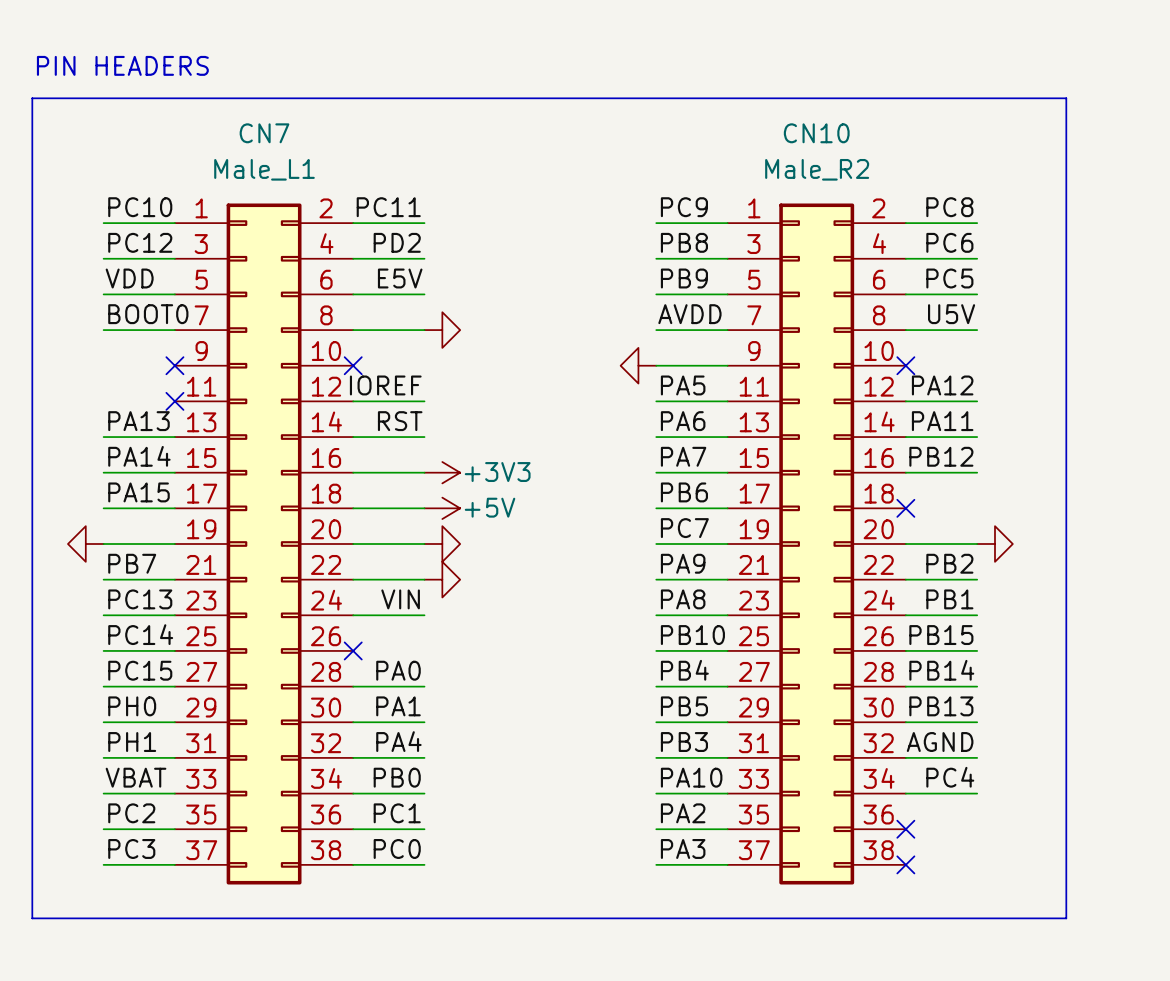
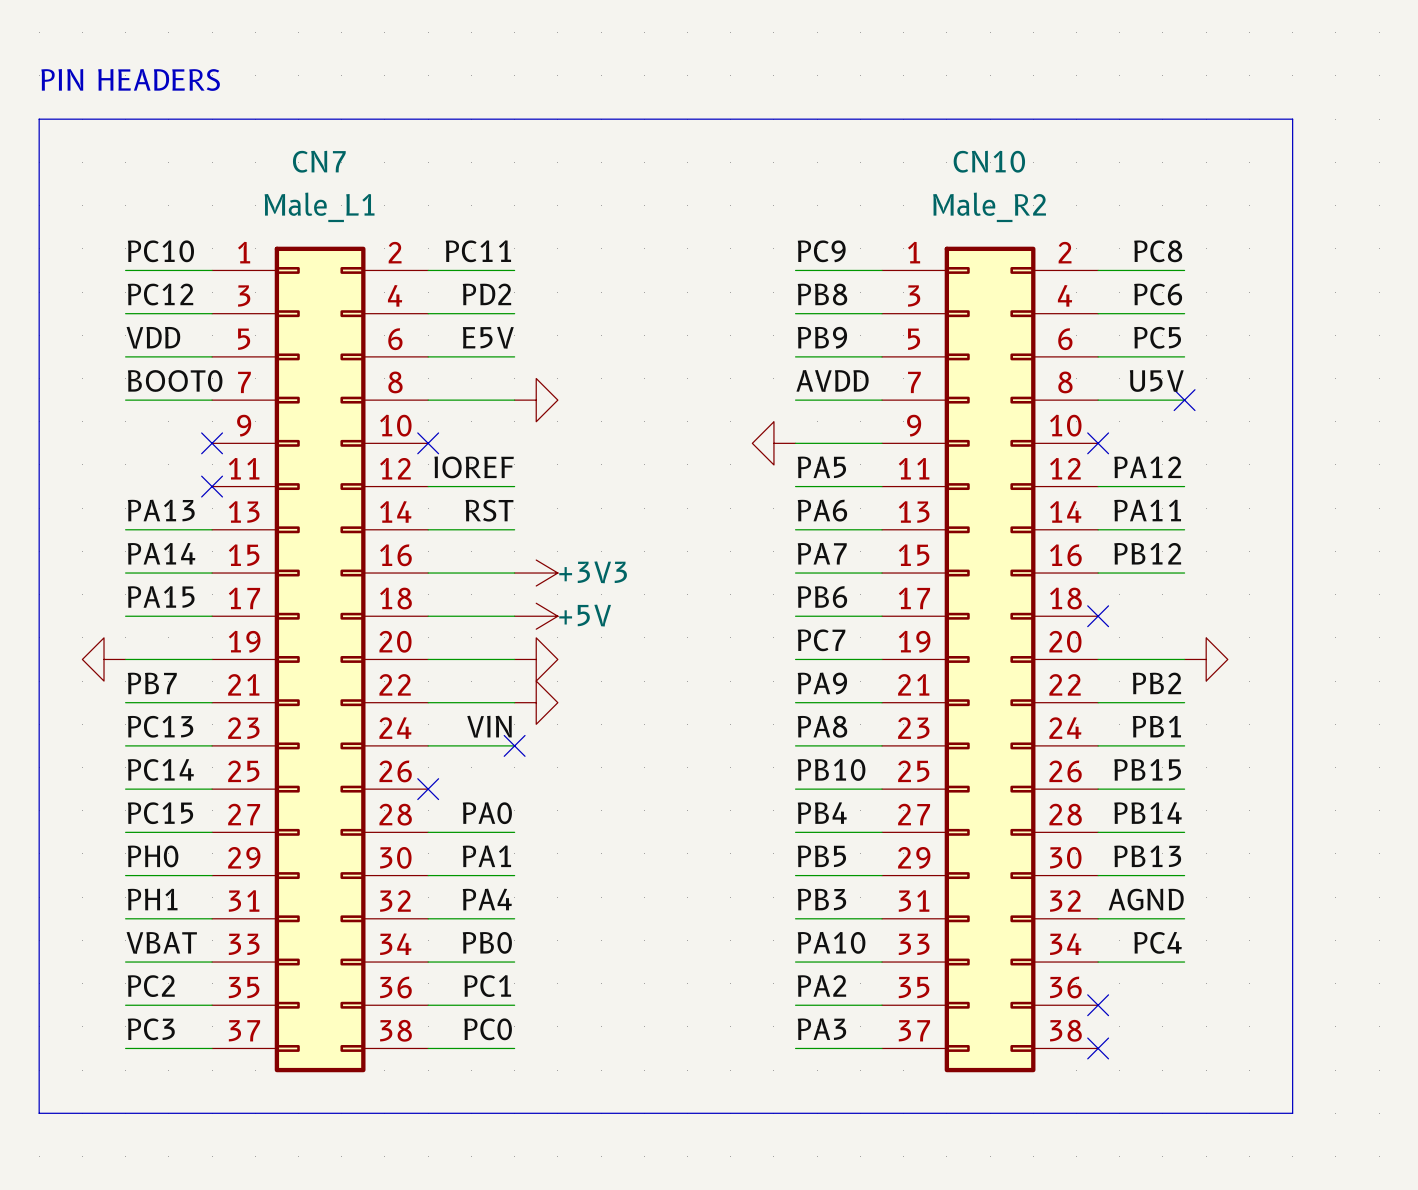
no-connect mark: none -> (1184, 400)
no-connect mark: none -> (514, 745)

